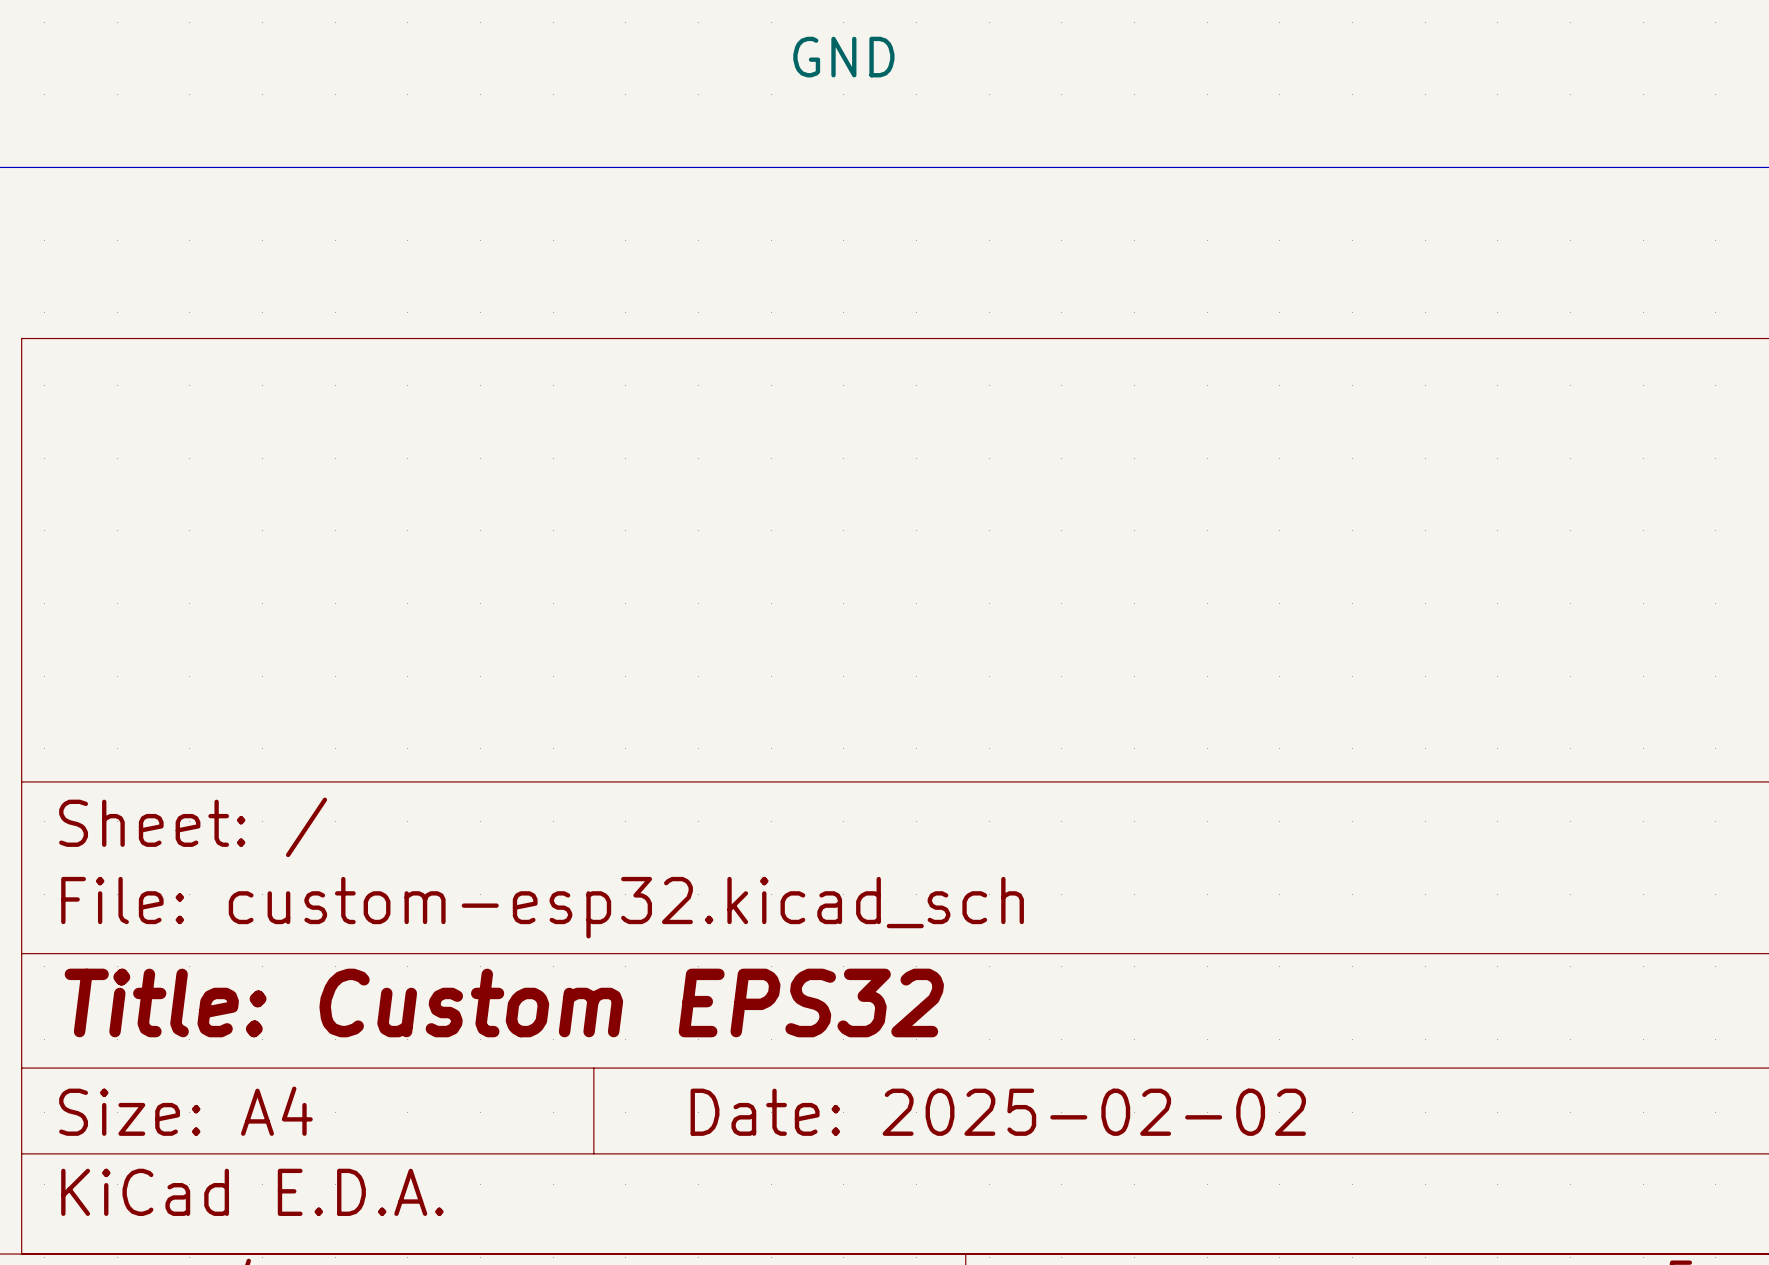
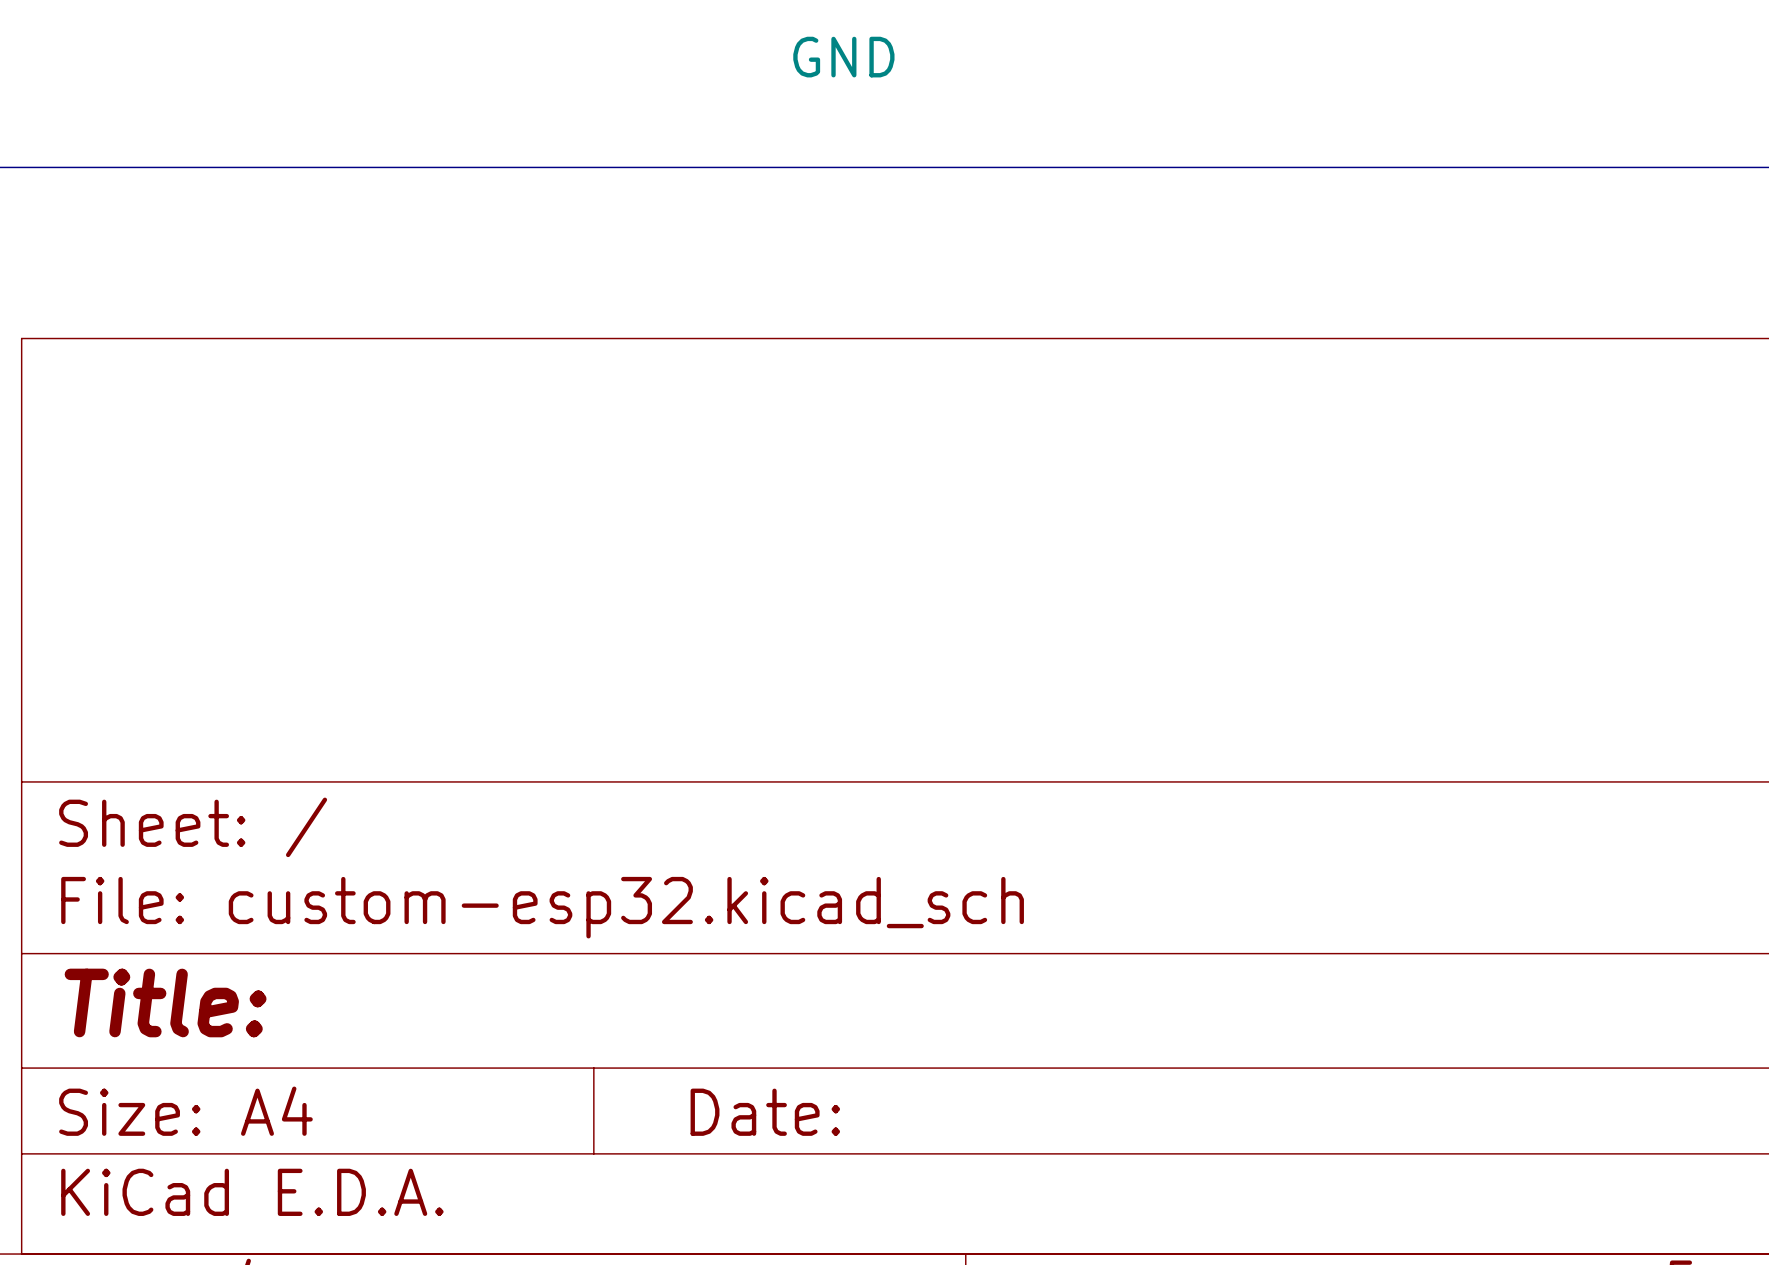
title block: Title: Custom EPS32 (504, 1002) -> Title: (165, 1002)
title block: Date: 2025-02-02 (998, 1112) -> Date: (765, 1112)

